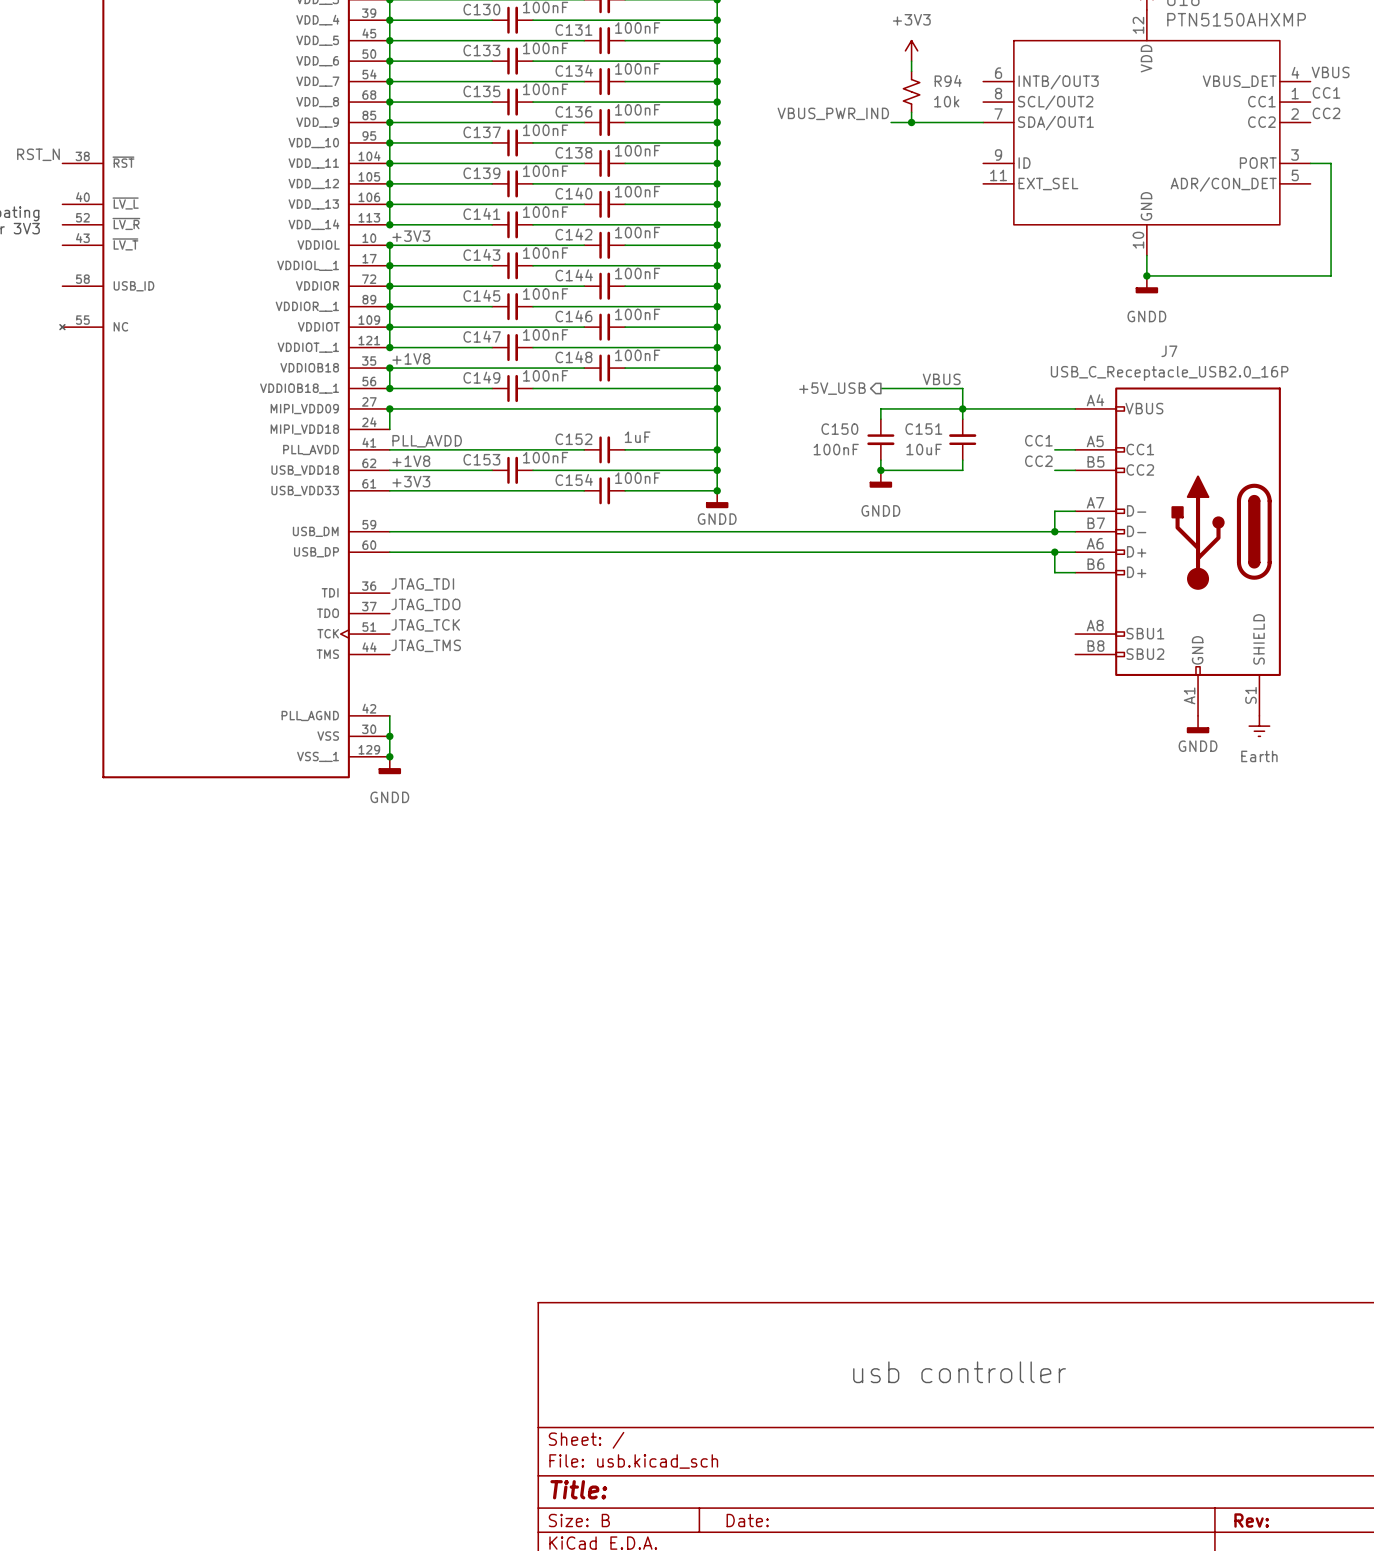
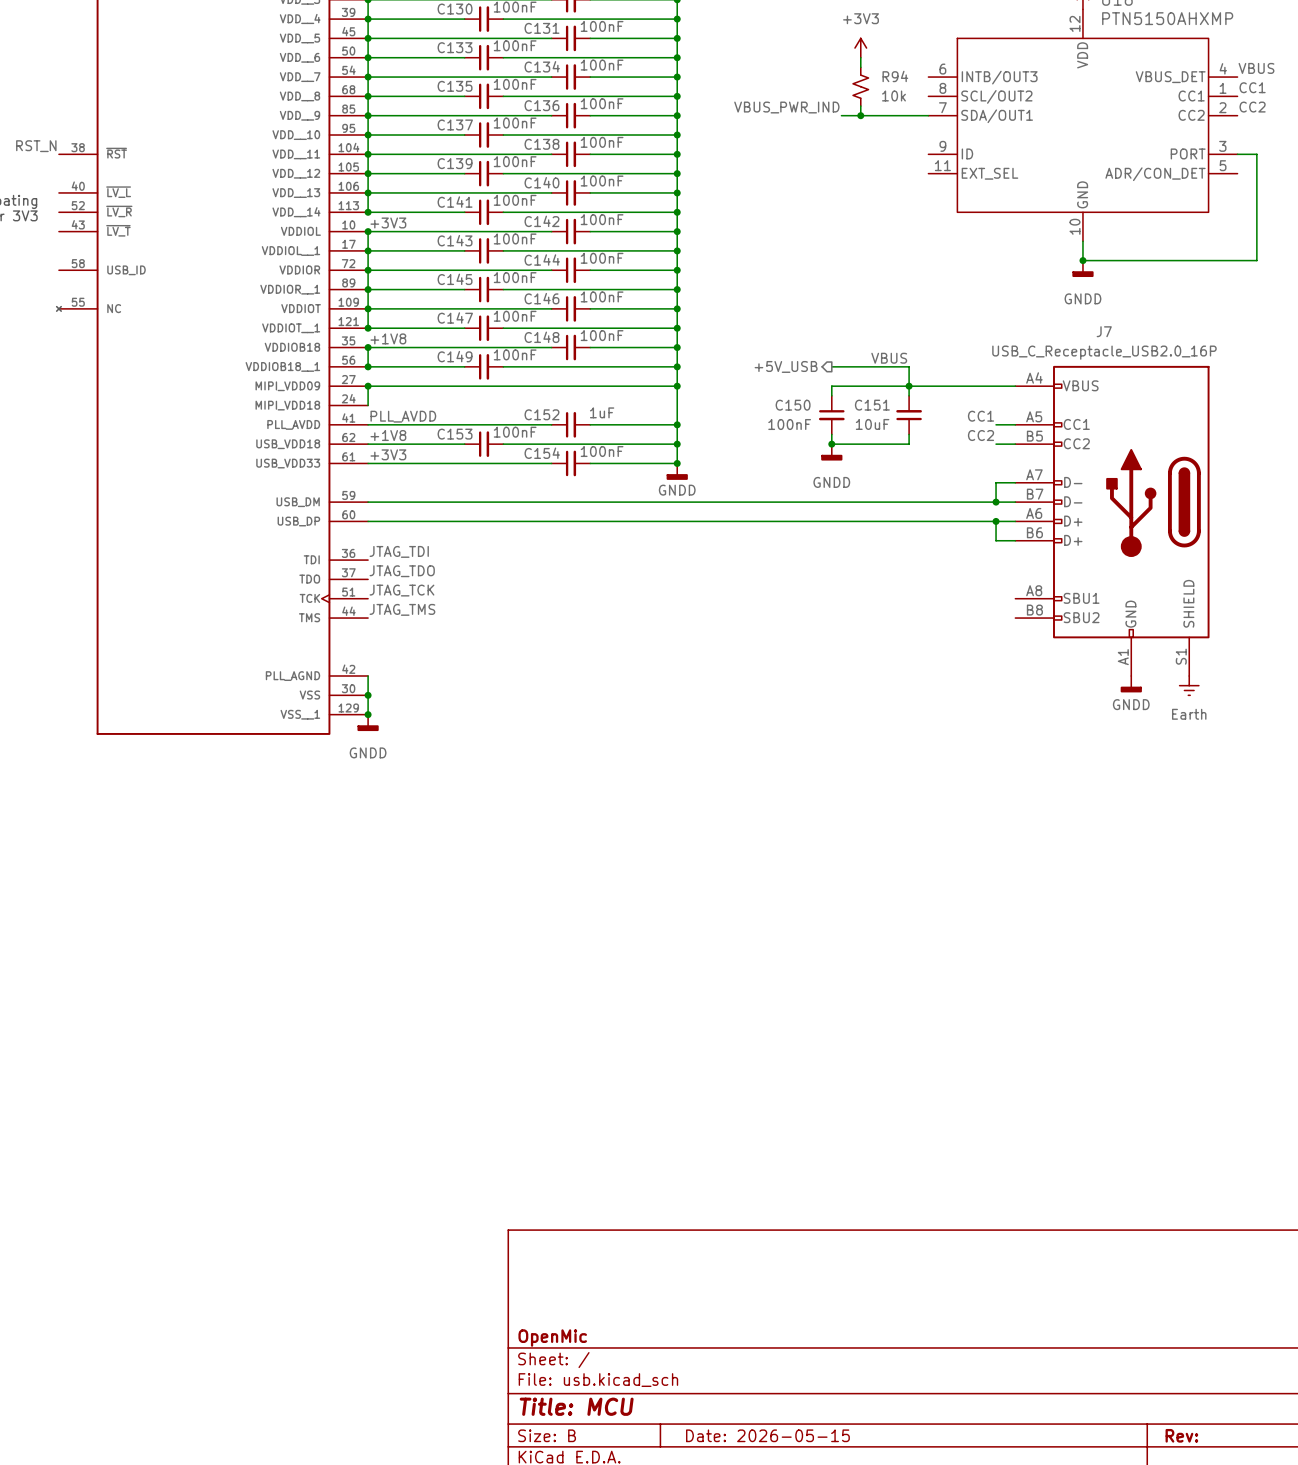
text: usb controller (959, 1372) -> none
title block: none -> OpenMic (552, 1338)
title block: Title: (578, 1489) -> Title: MCU (576, 1406)
title block: Date: (747, 1520) -> Date: 2026-05-15 (767, 1435)

